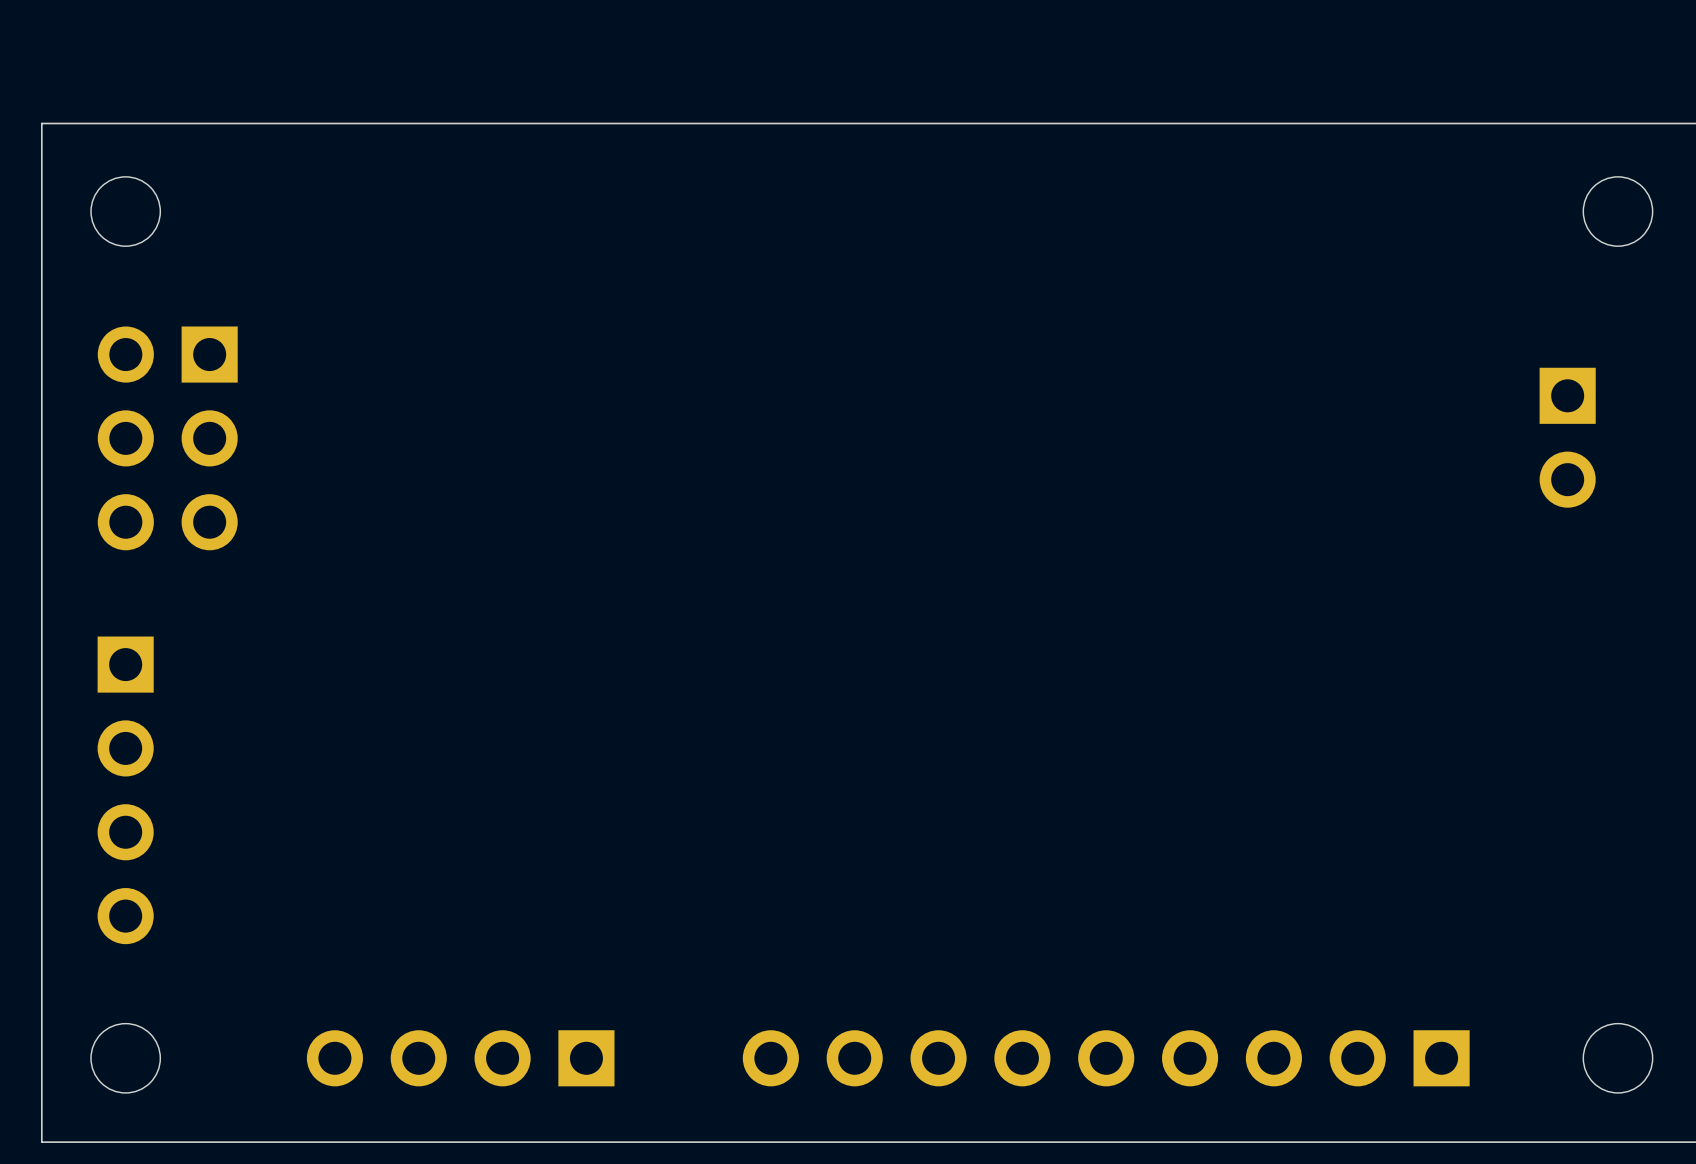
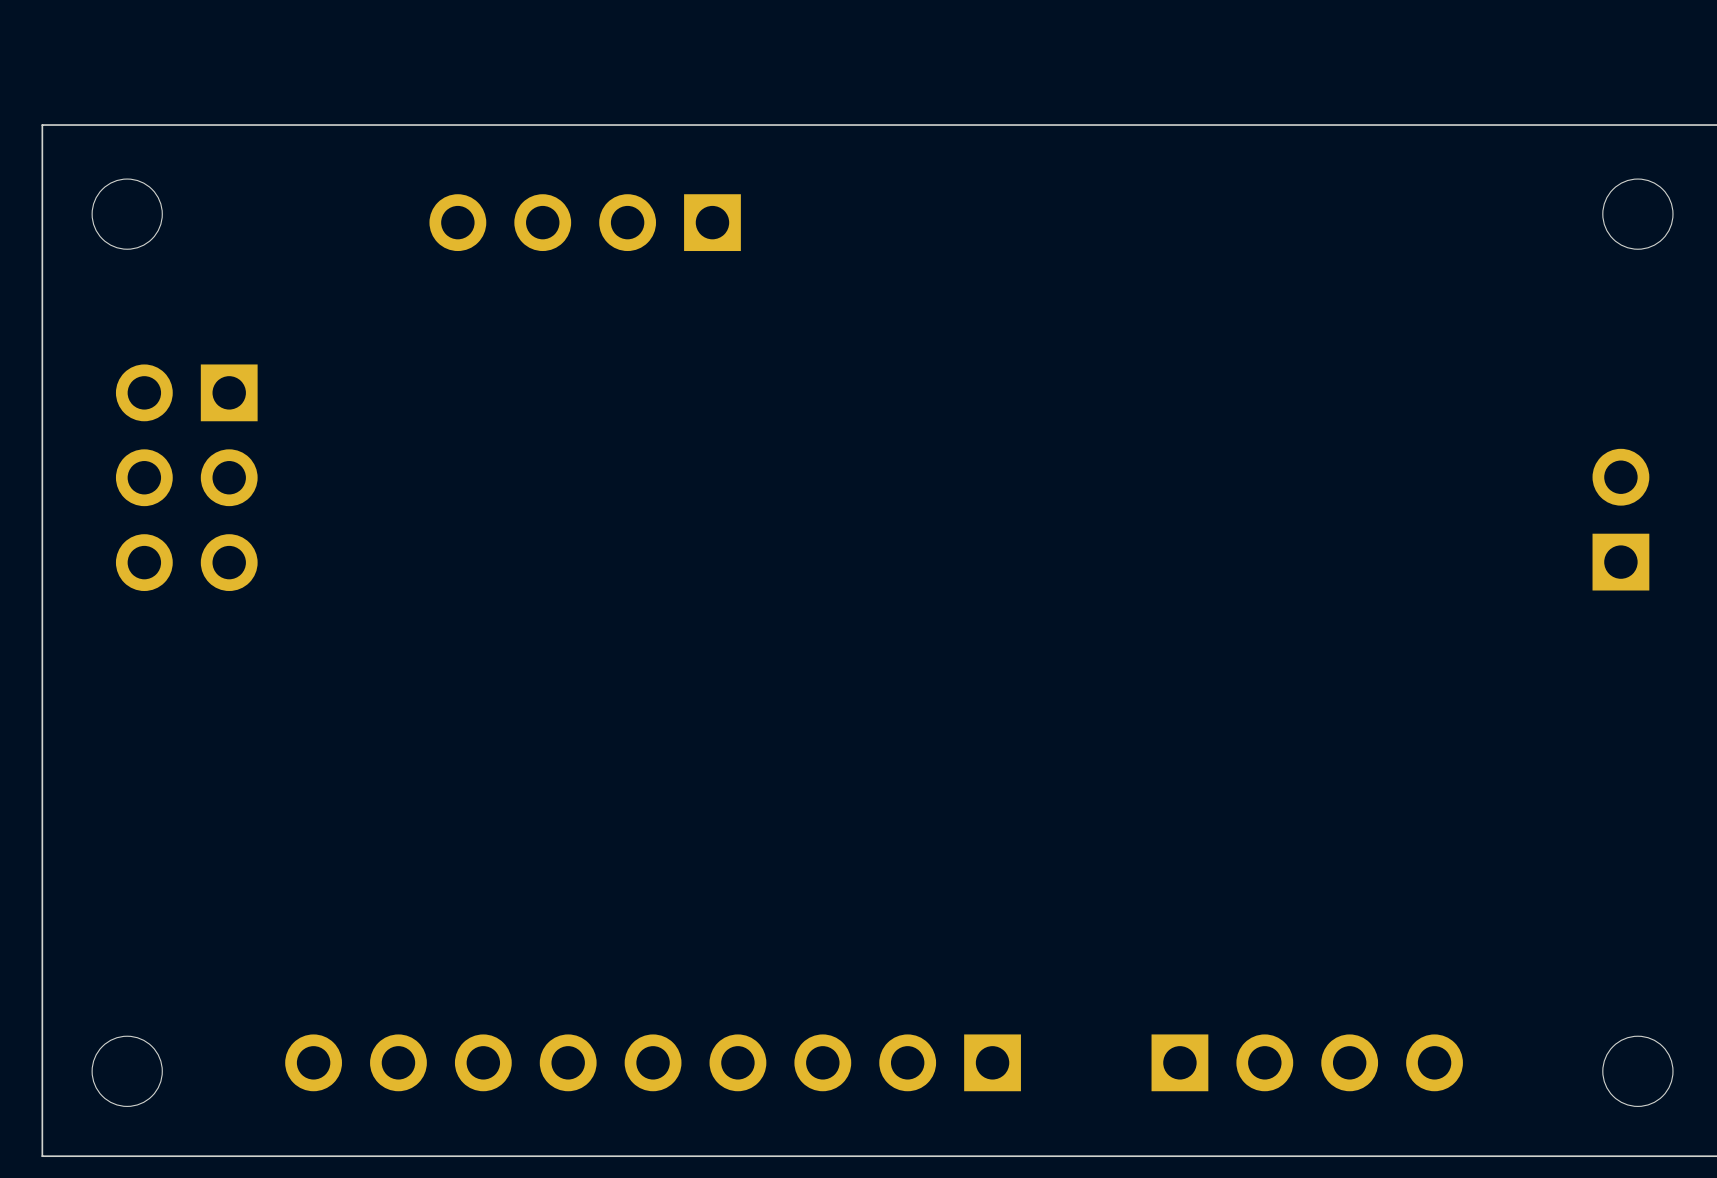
part: none -> (585, 222)
part rotation: 0° (1567, 437) -> 180° (1620, 519)
part position: (167, 438) -> (186, 477)
part: (125, 790) -> none
part: none -> (1307, 1062)
part: (460, 1058) -> none
part position: (1106, 1058) -> (653, 1062)

